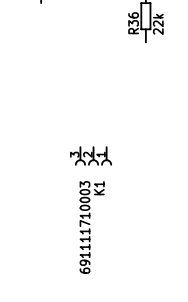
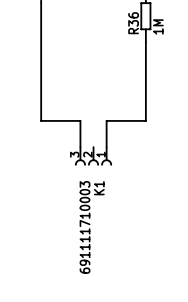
wire: none -> (41, 3) (41, 120) (80, 120) (80, 147)
R36 value: 22k (158, 24) -> 1M (158, 26)
wire: none -> (145, 42) (145, 120) (106, 120) (106, 147)

